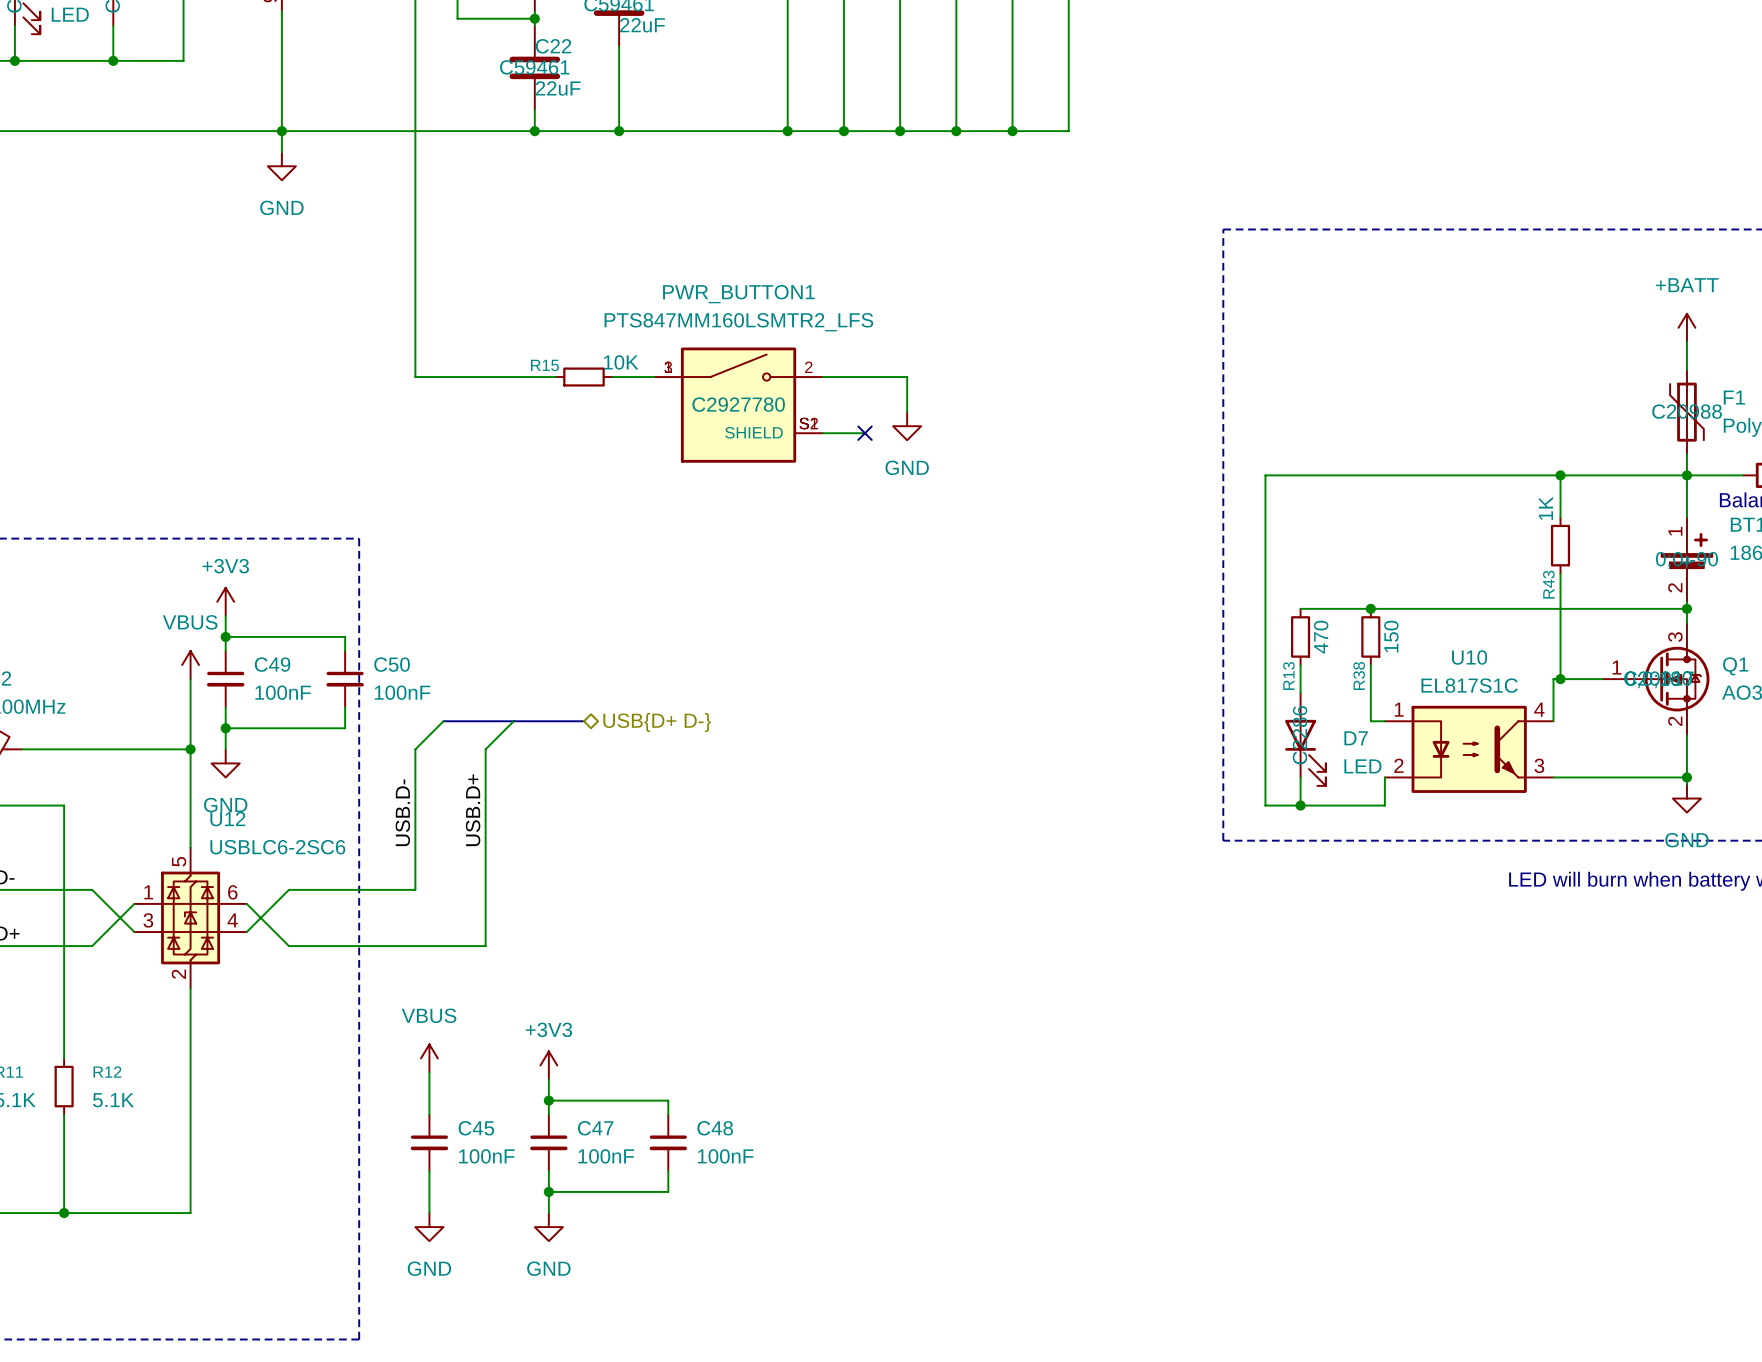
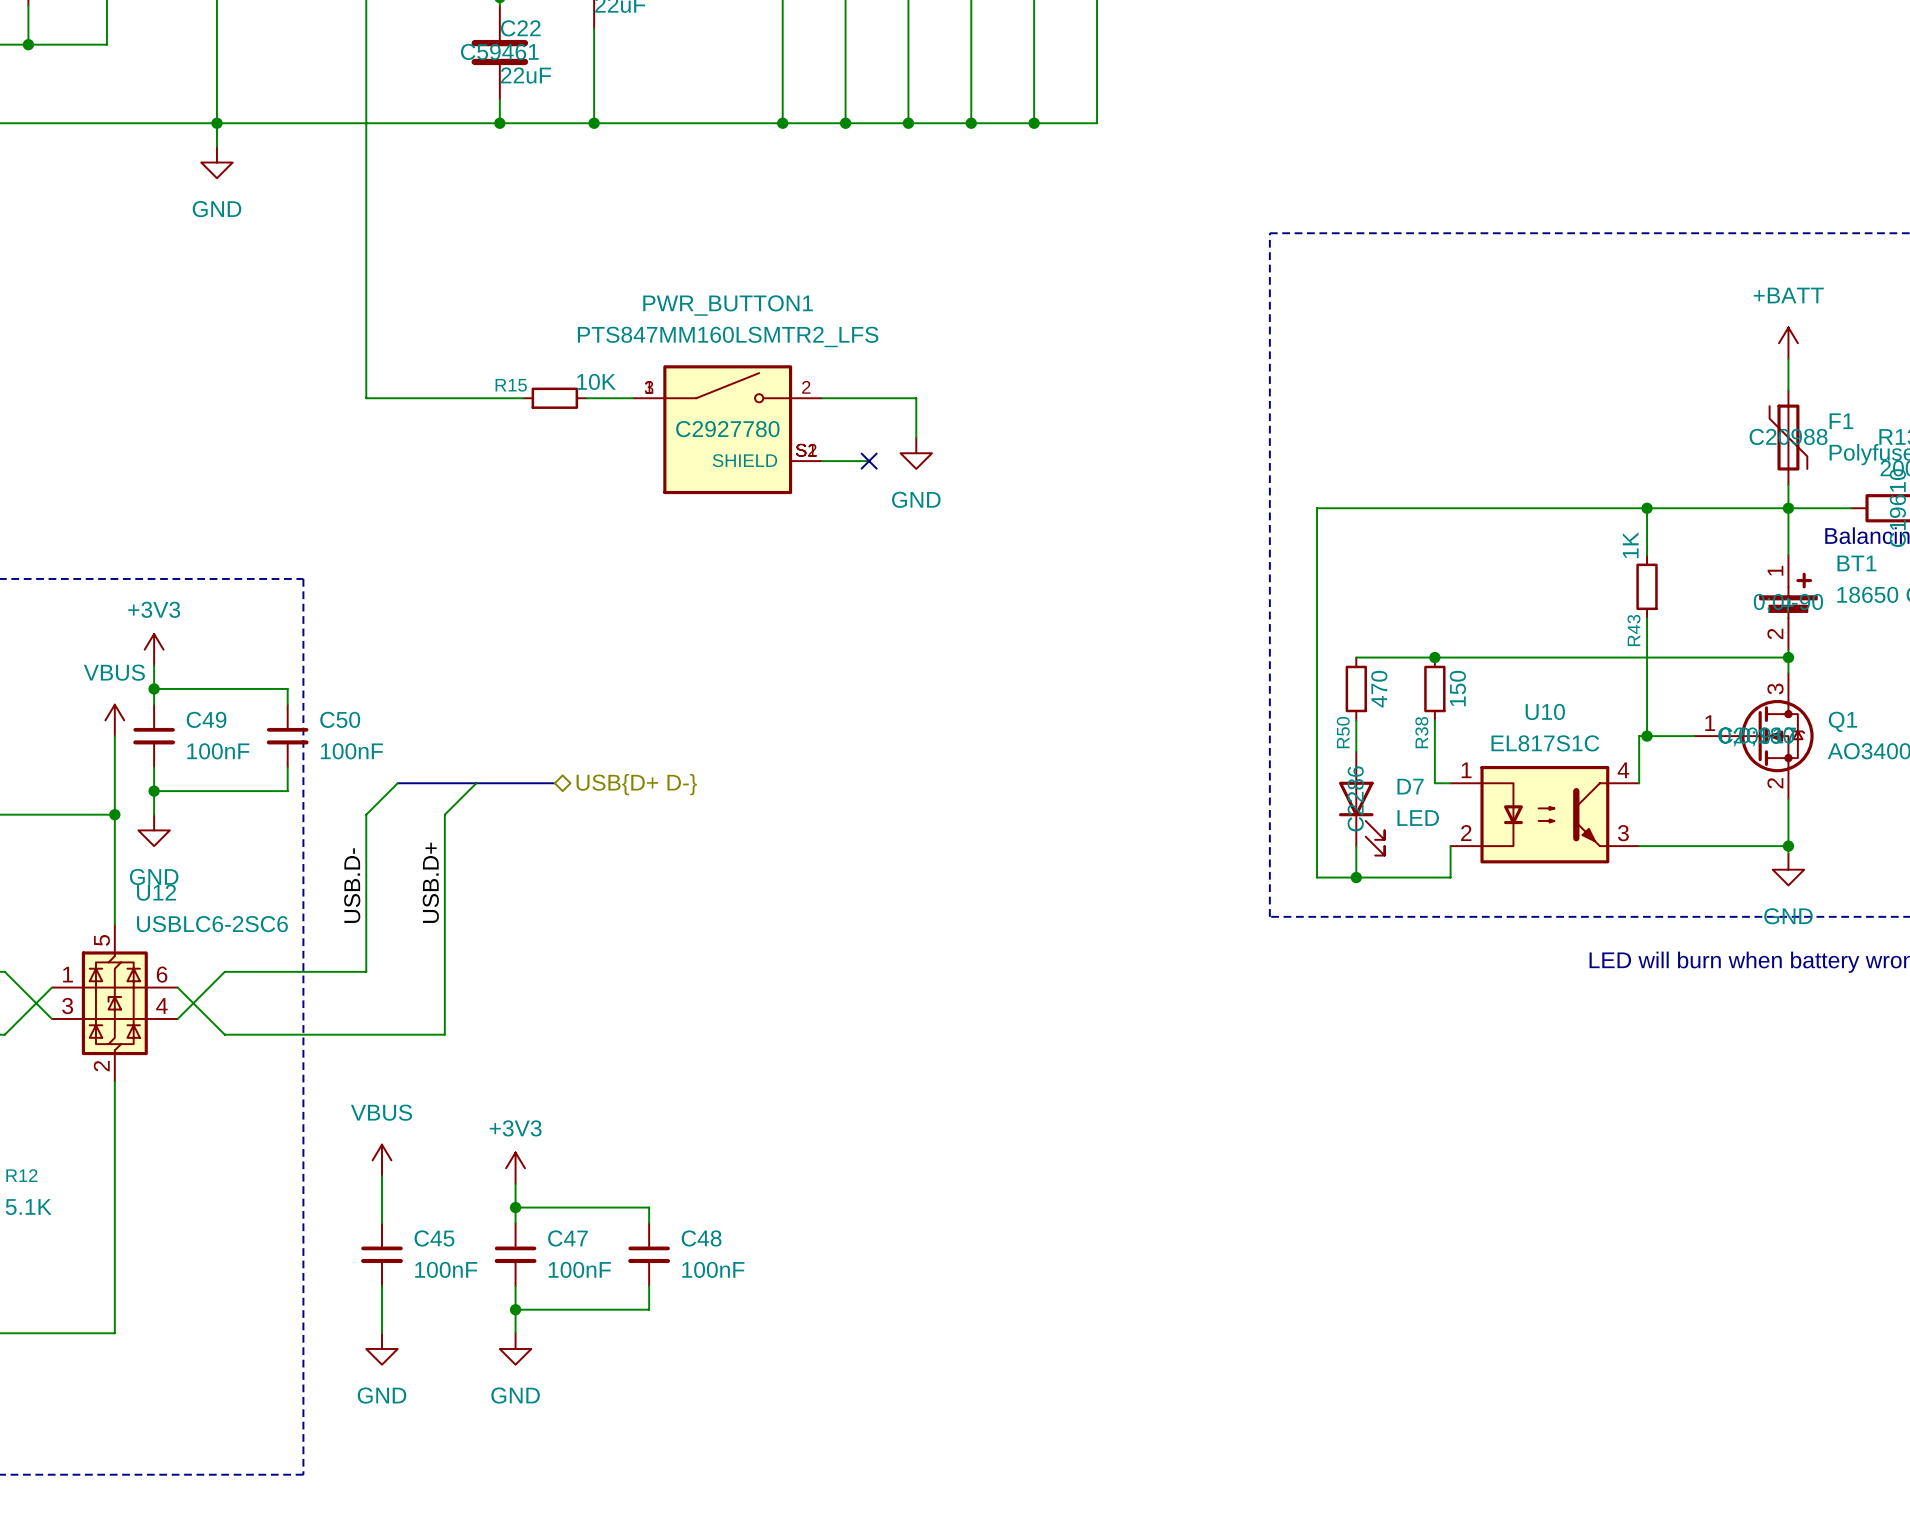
R13 name: R13 (1288, 675) -> R50 (1343, 732)
D7 name position: D7 (1356, 738) -> D7 (1410, 786)
D7 value position: LED (1362, 766) -> LED (1418, 818)

